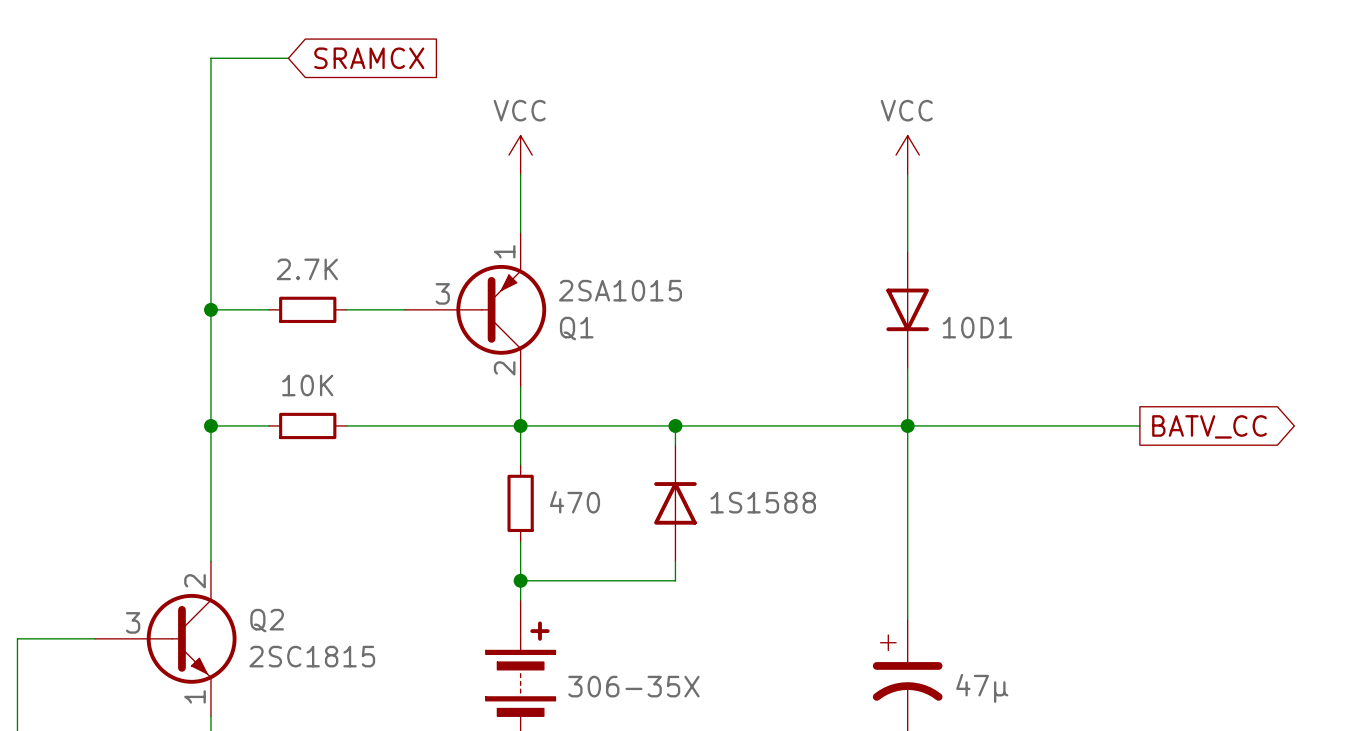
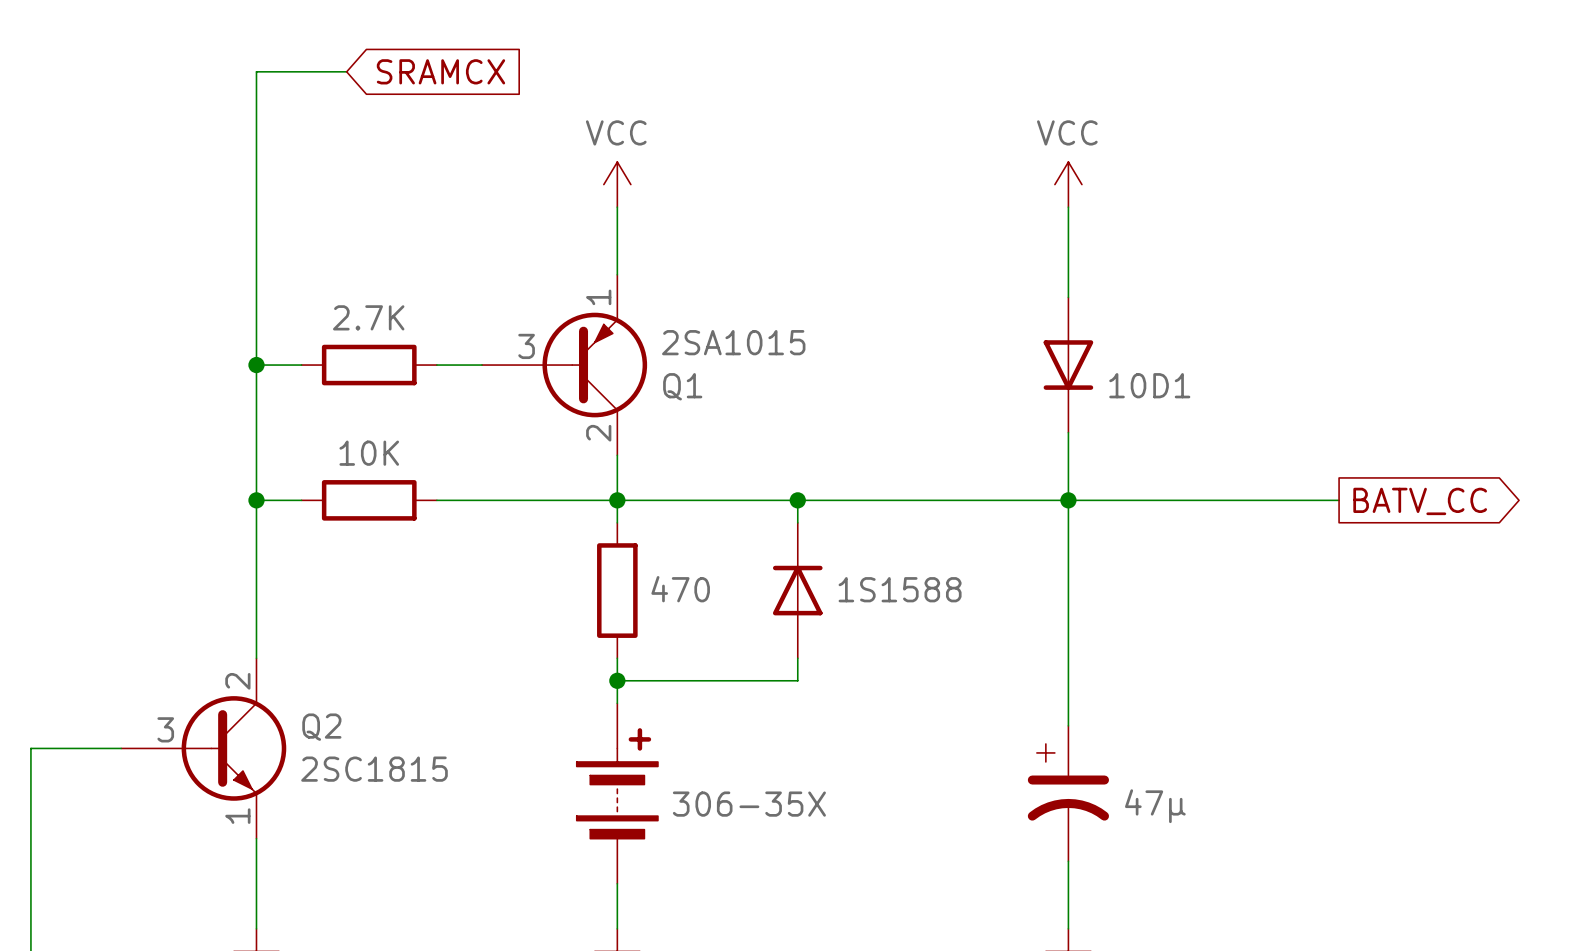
part symbol: [269, 296, 347, 324] -> [301, 344, 437, 386]
part symbol: [269, 412, 347, 440] -> [301, 480, 437, 521]
part symbol: [507, 464, 534, 543] -> [597, 522, 638, 659]

